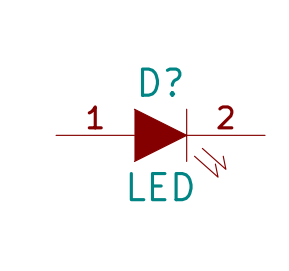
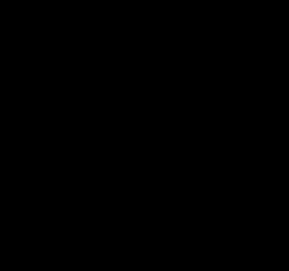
D?: LED (160, 143) -> none

